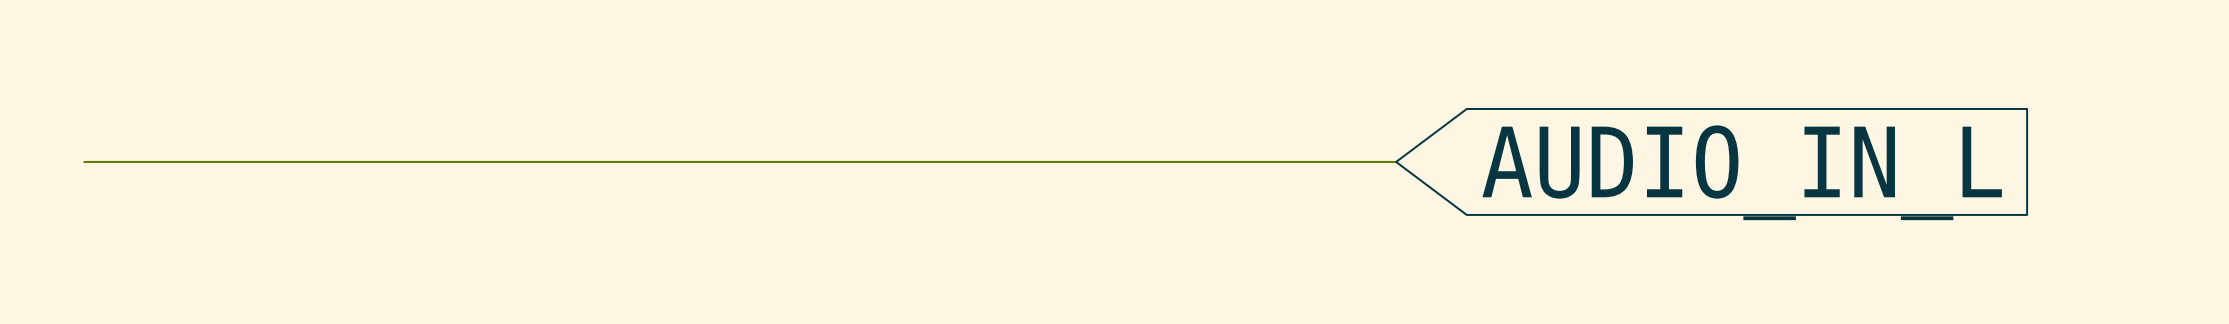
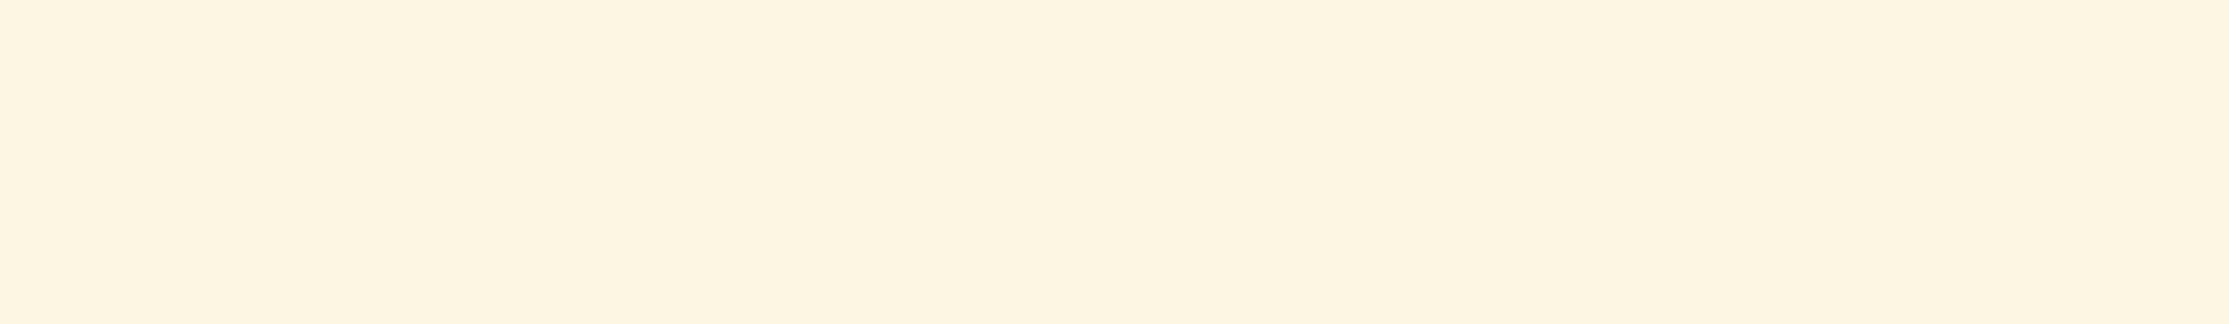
wire: (84, 161) (1396, 161) -> none
global label: AUDIO_IN_L (1742, 172) -> none

